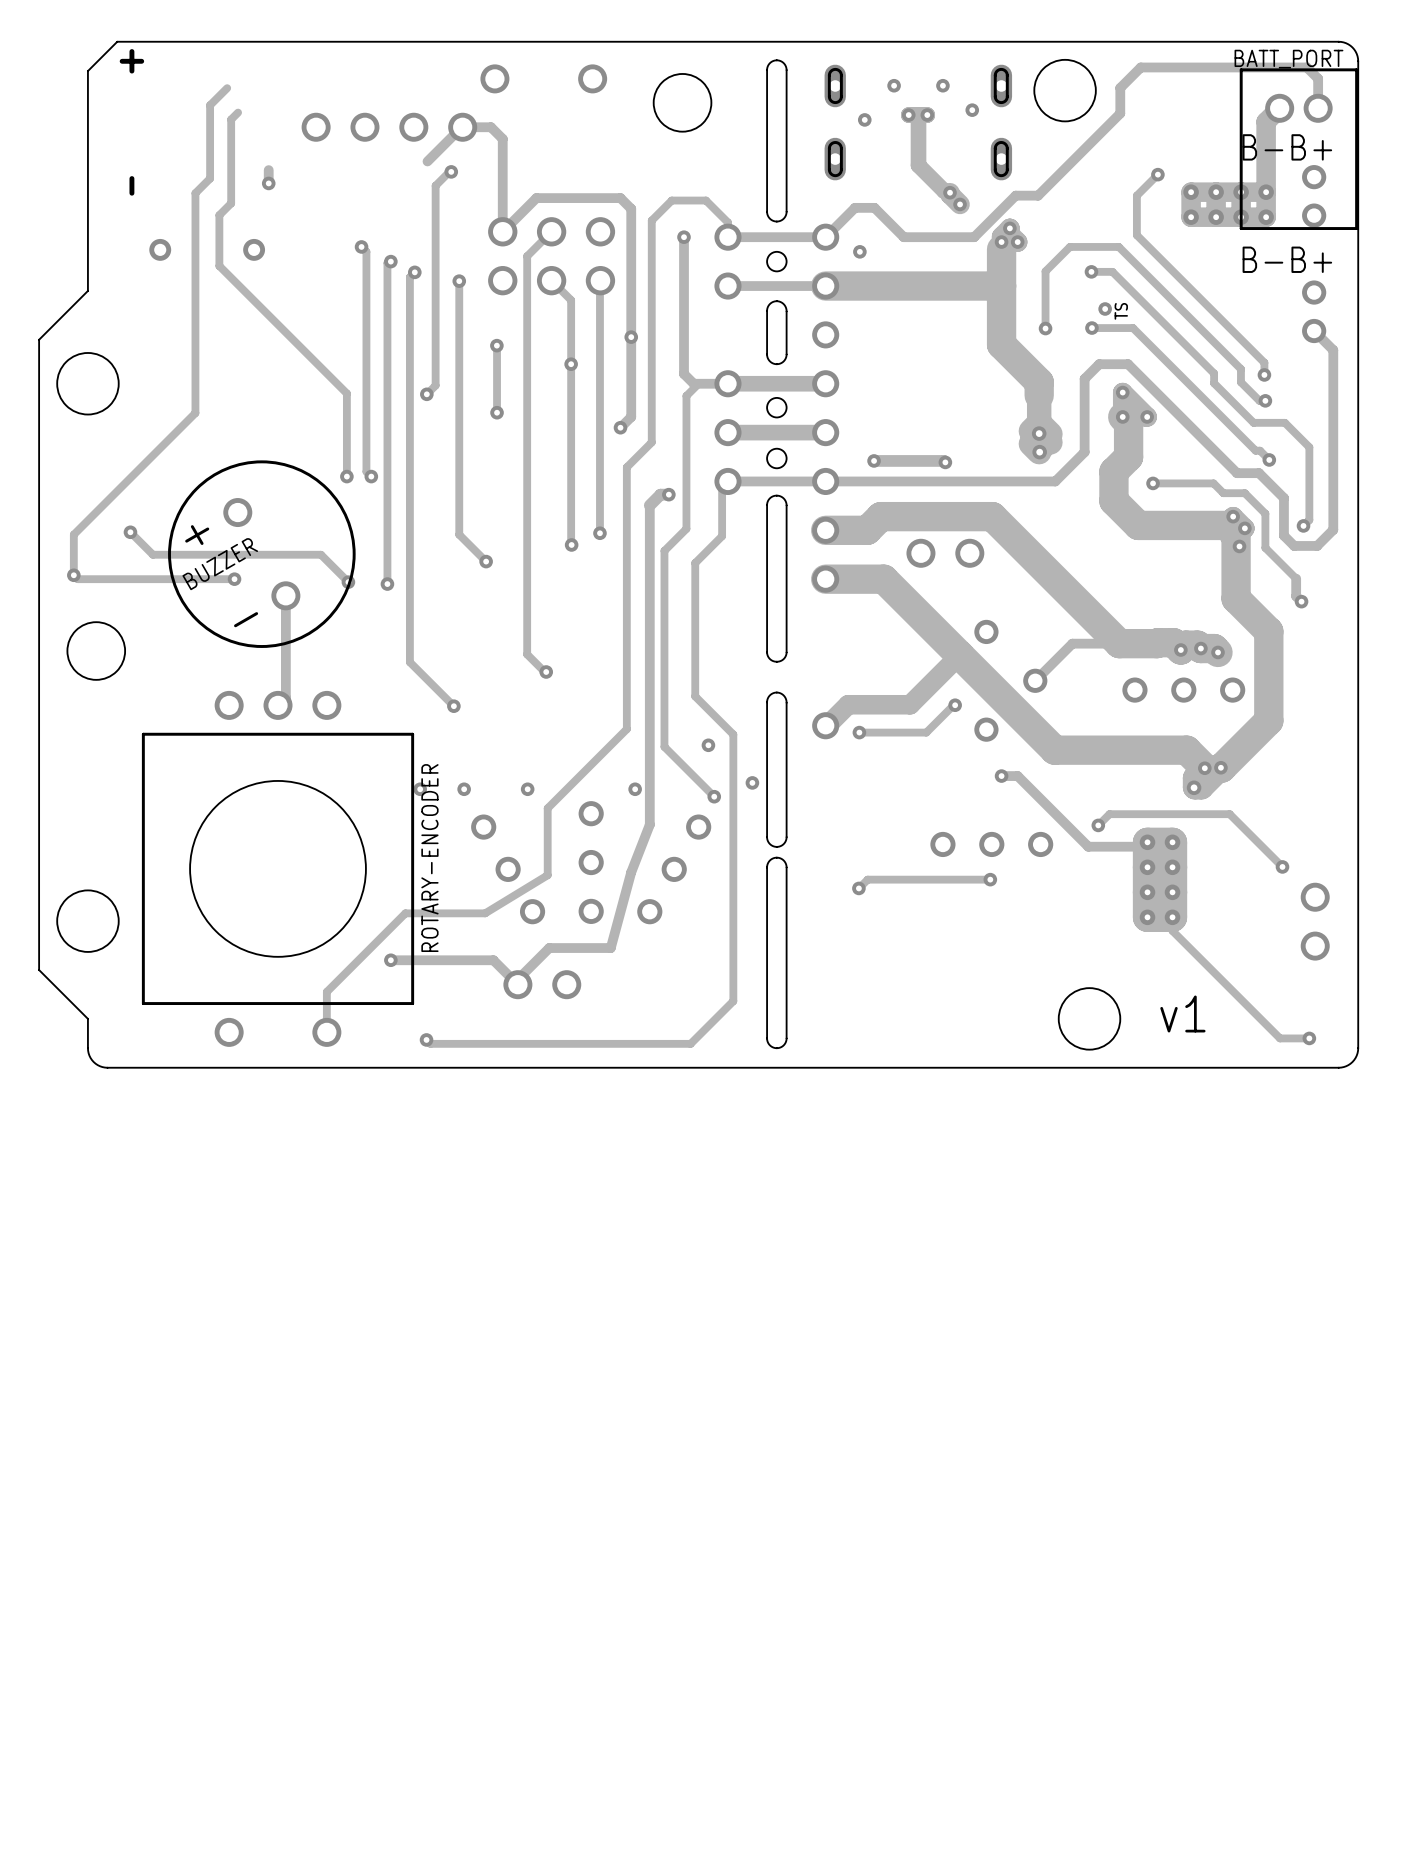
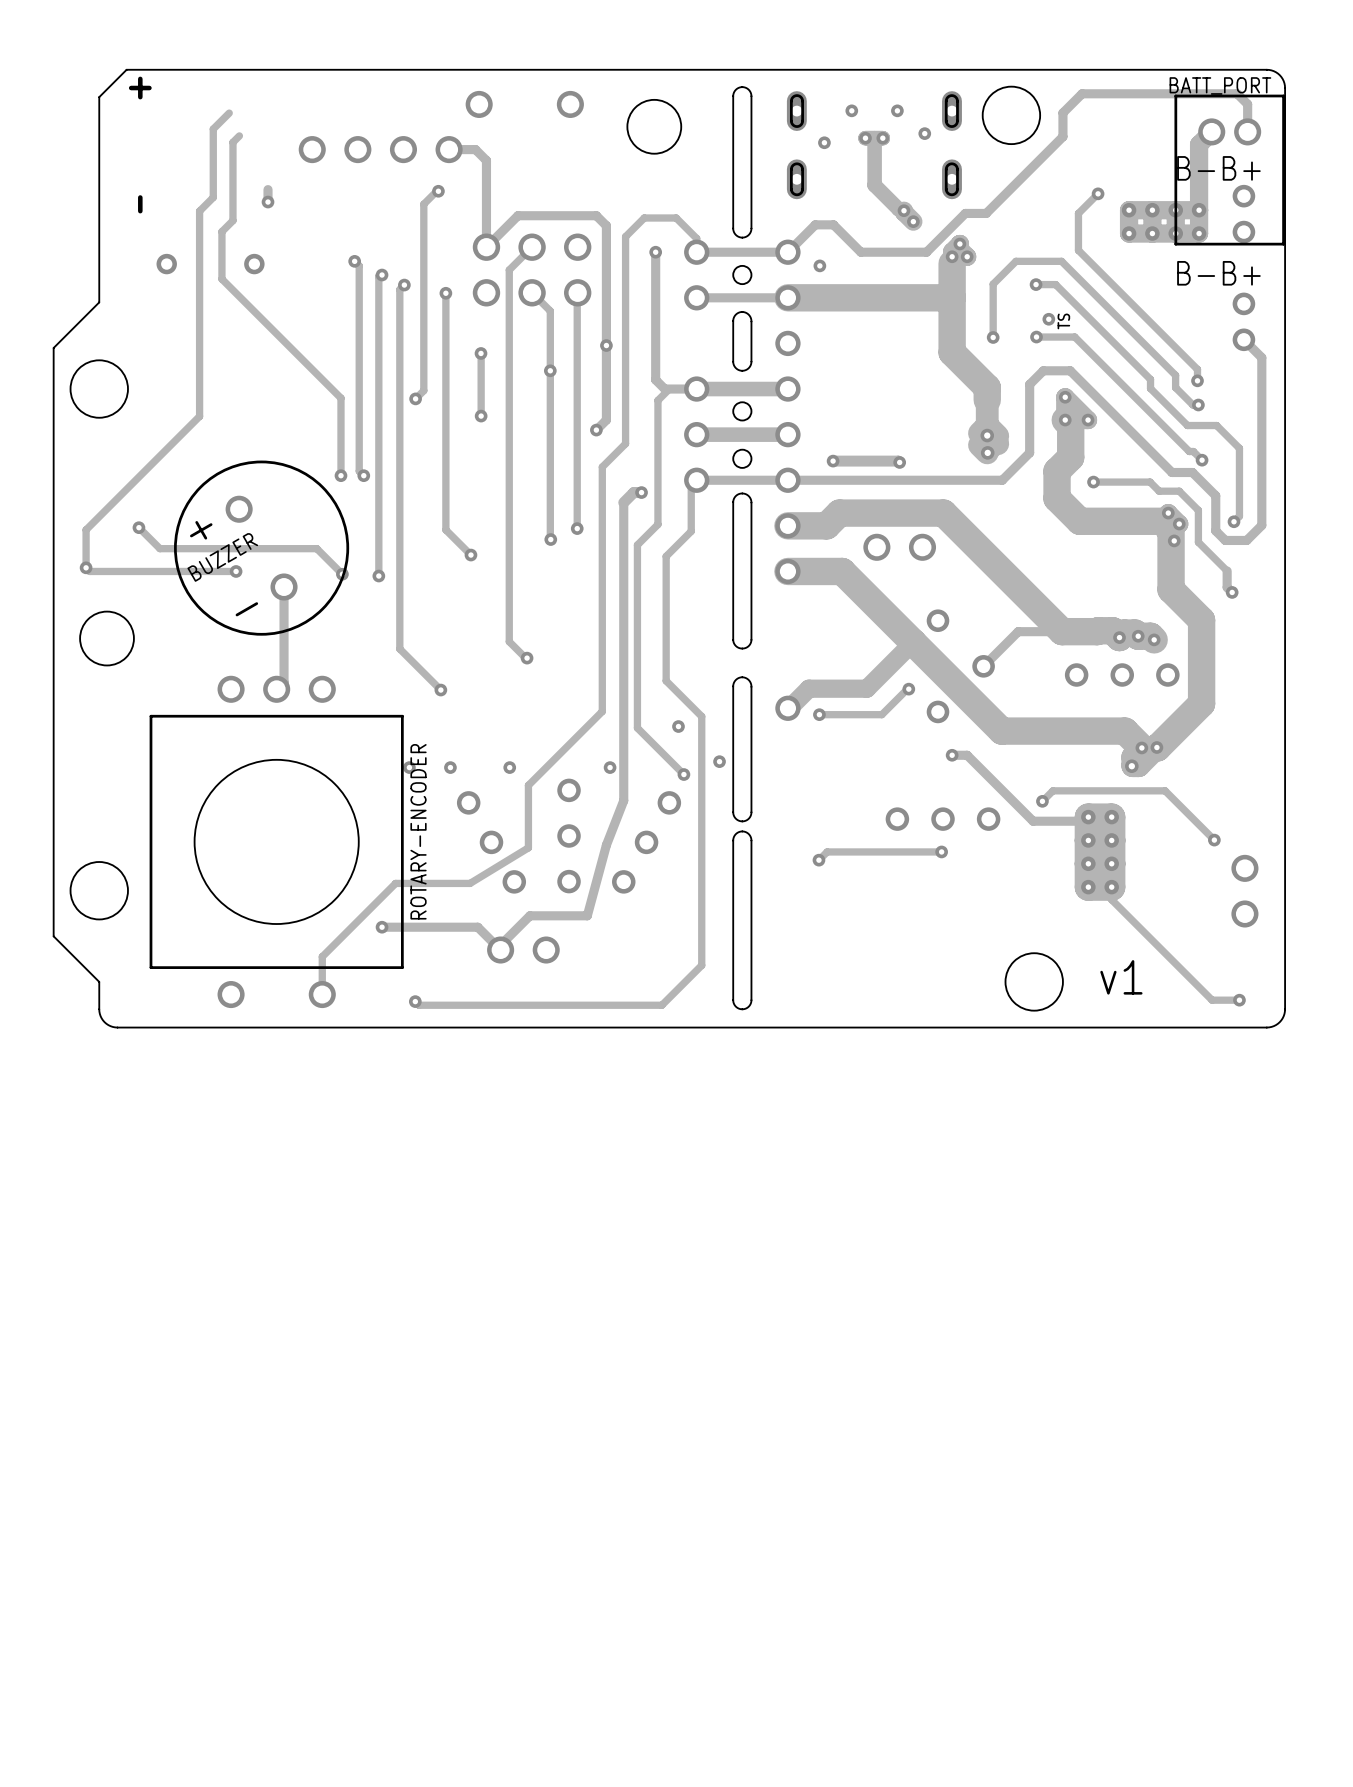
track: (461, 127) (427, 161) -> none

